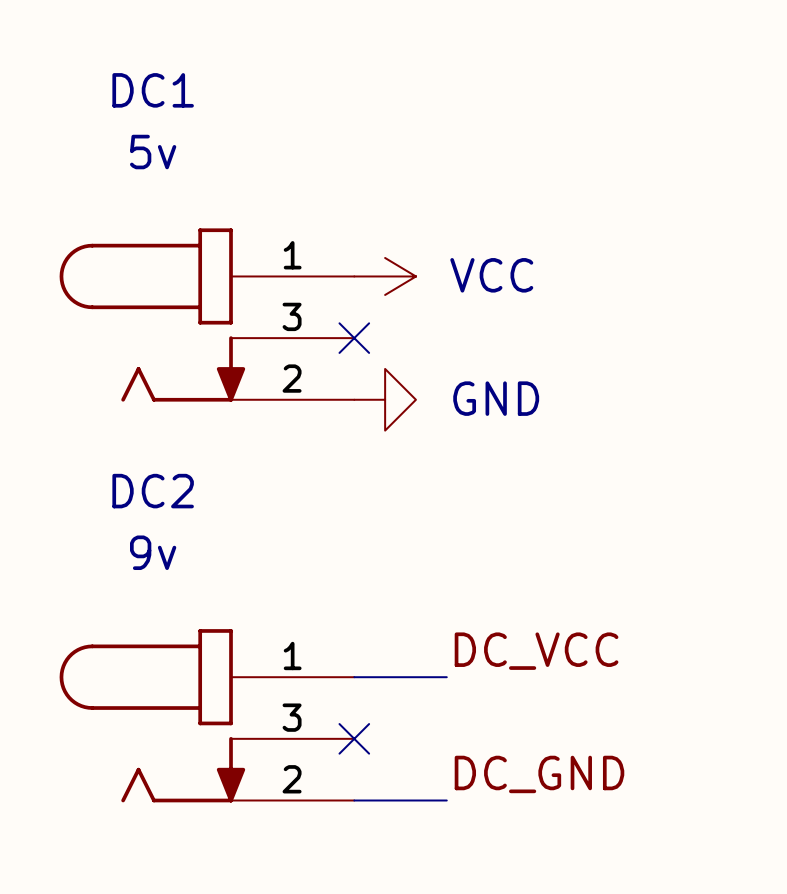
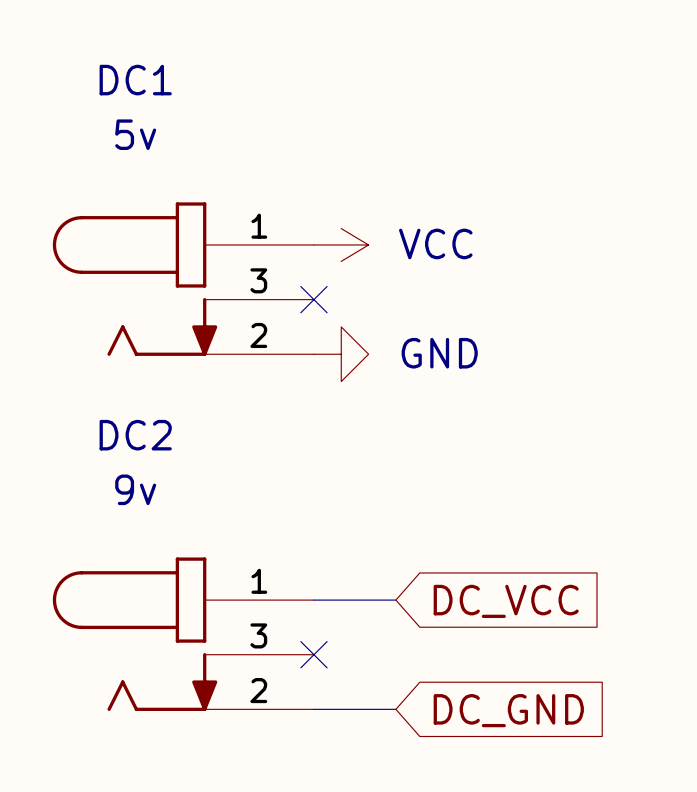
label: DC_VCC (536, 651) -> none
global label: none -> DC_VCC (506, 601)
label: DC_GND (539, 774) -> none
global label: none -> DC_GND (508, 710)

